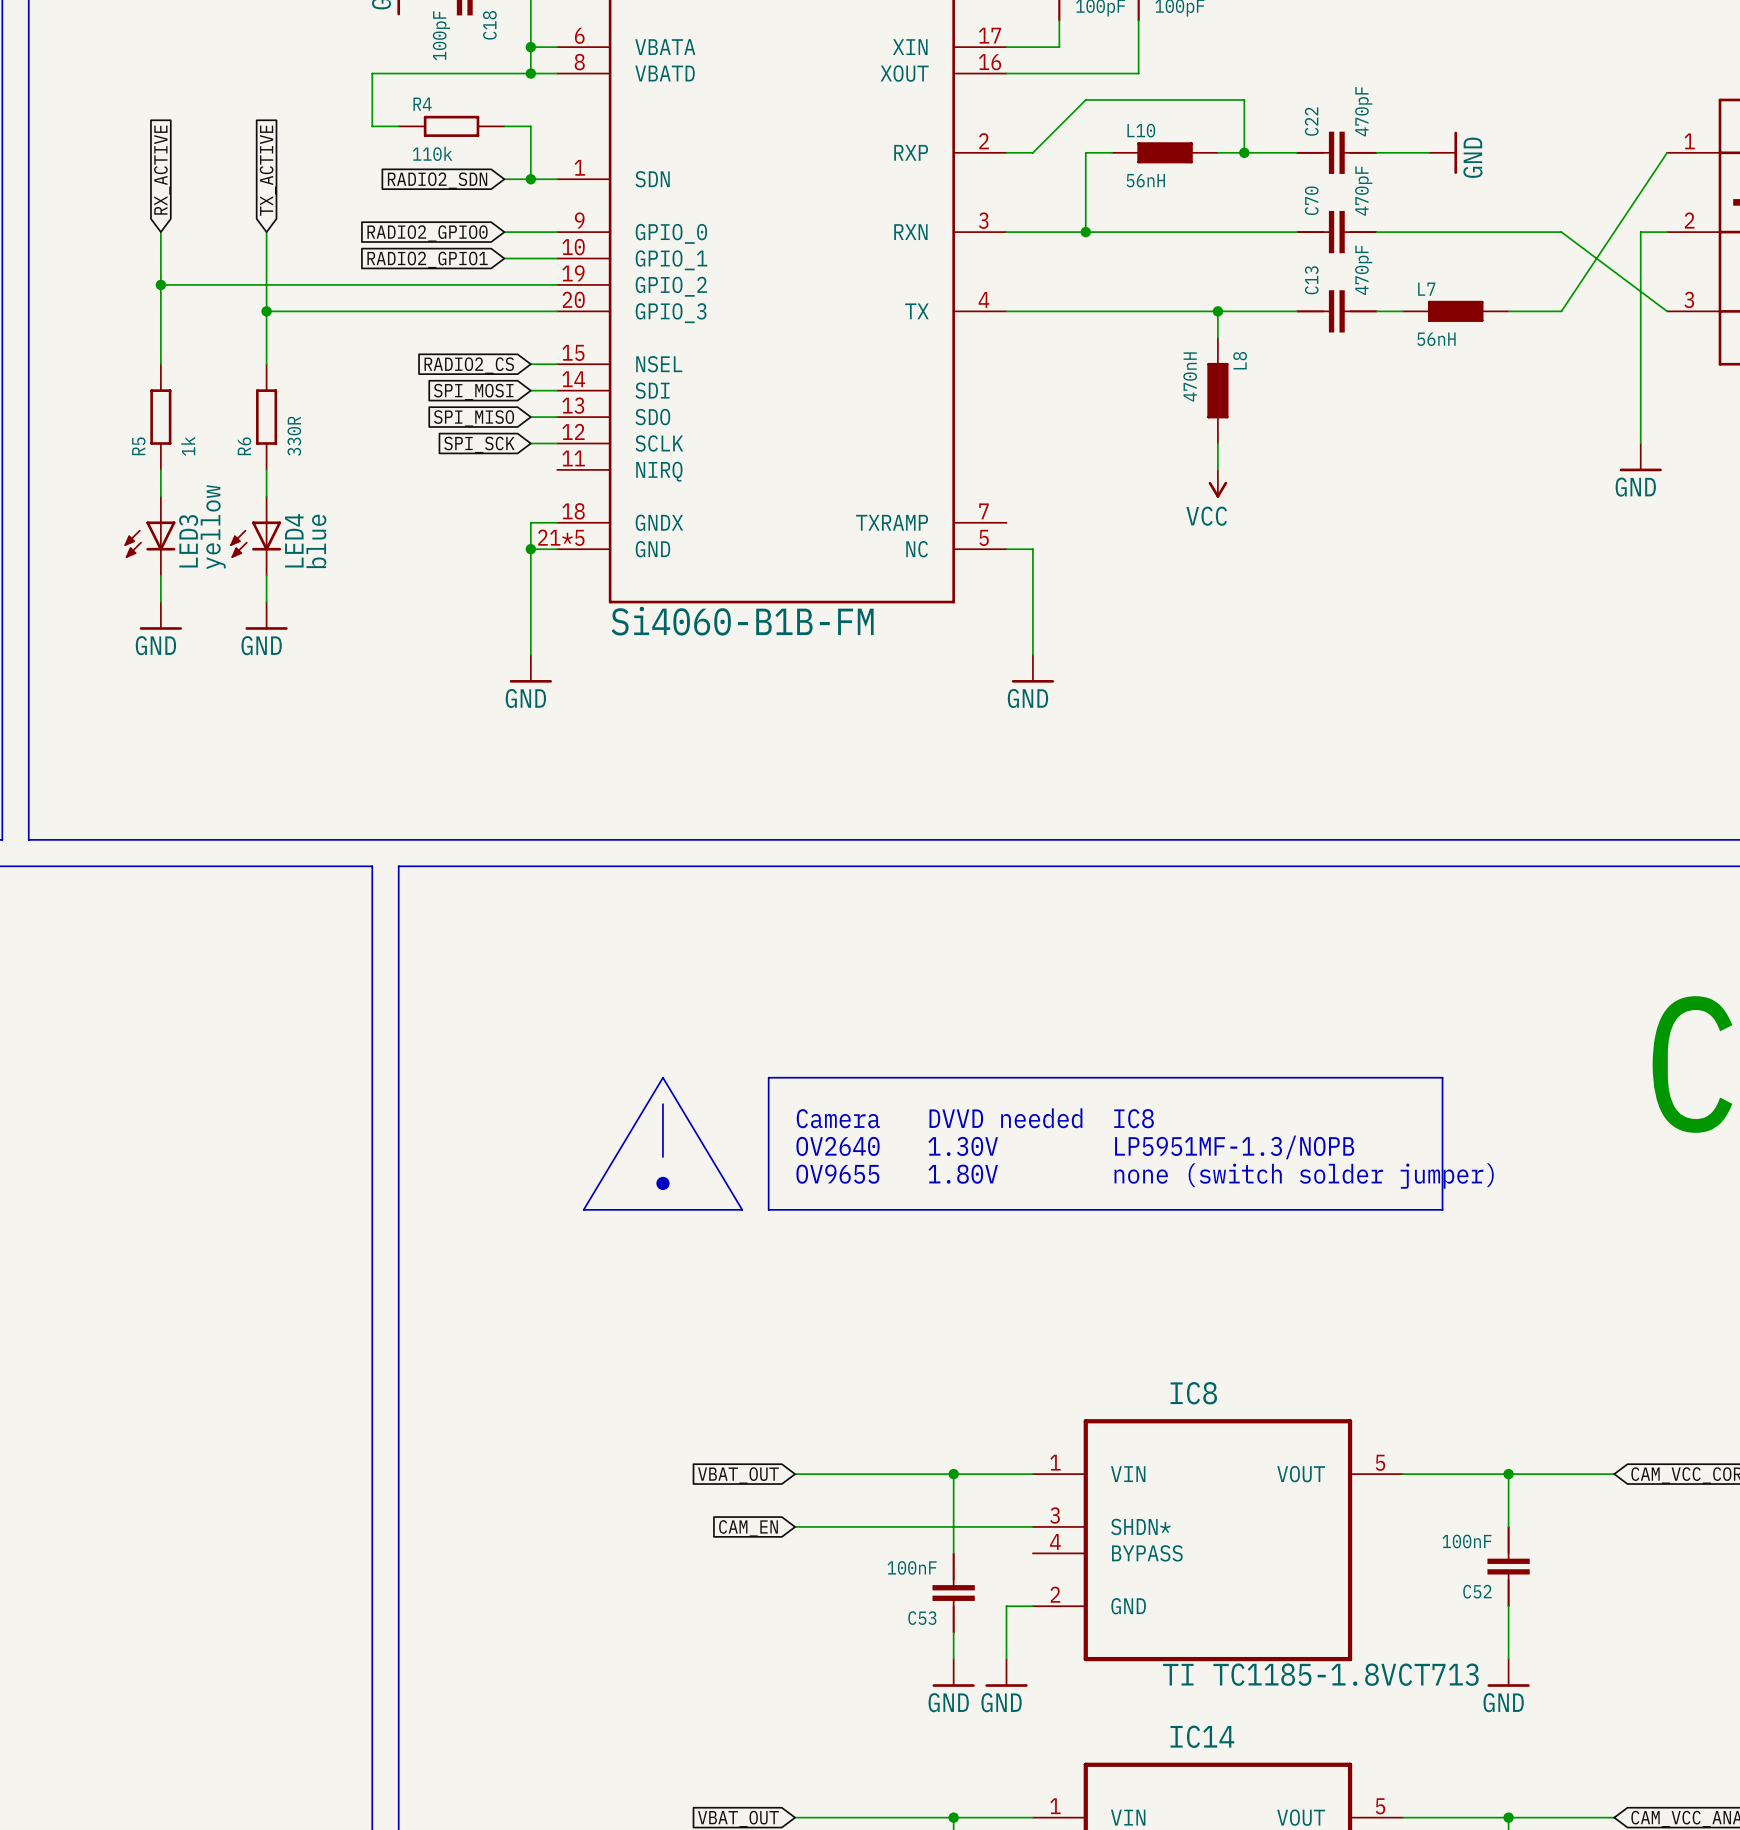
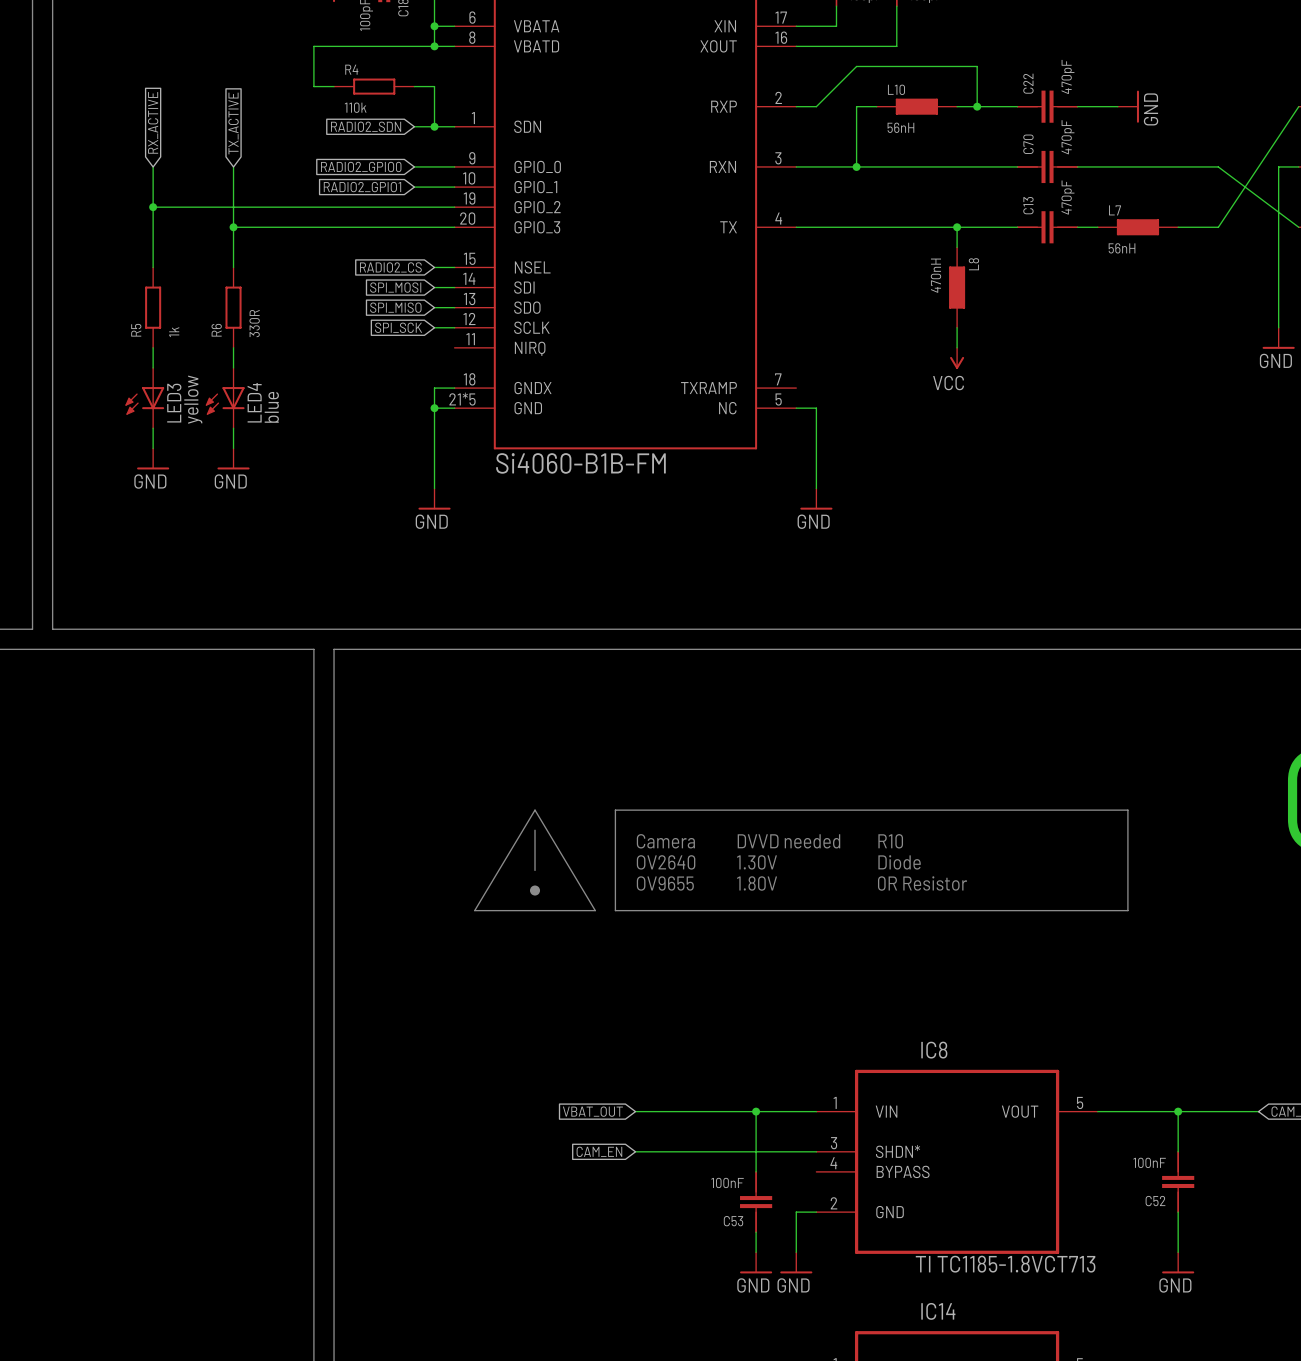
text: IC8 (1134, 1118) -> R10 (890, 841)
text: LP5951MF-1.3/NOPB (1234, 1147) -> Diode (899, 862)
text: none (switch solder jumper) (1304, 1176) -> 0R Resistor (922, 883)

